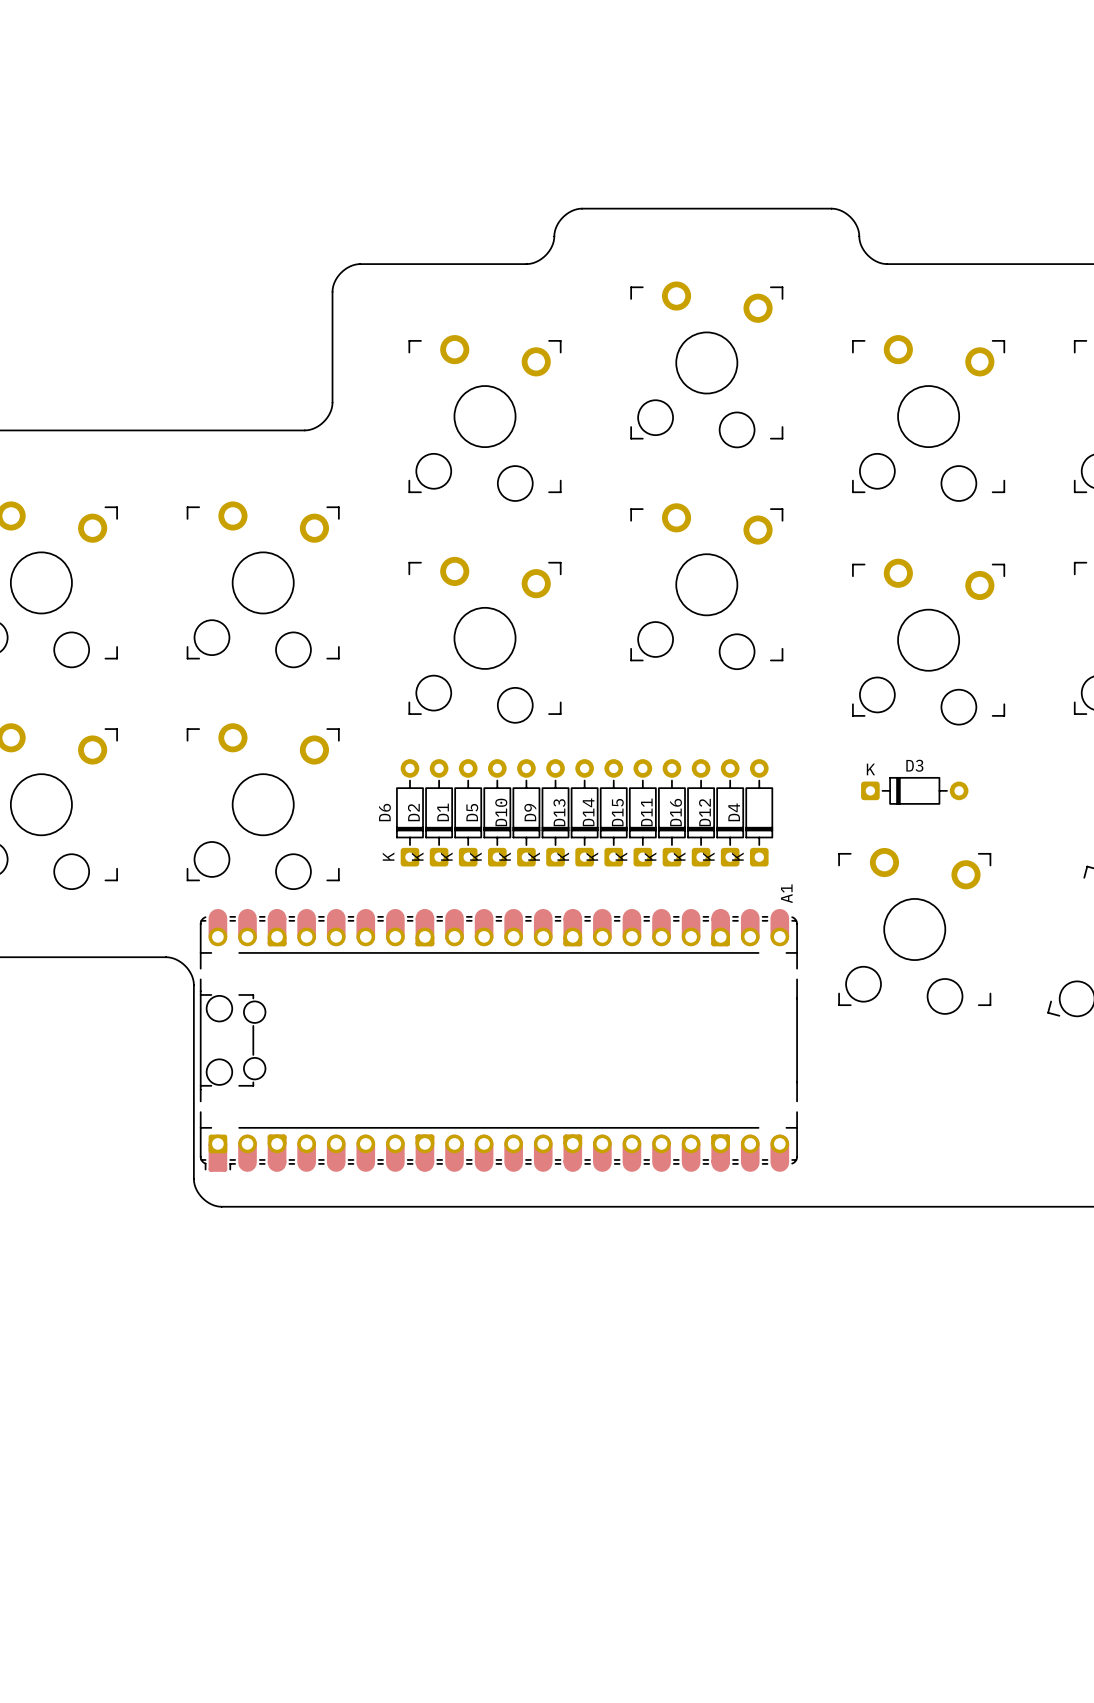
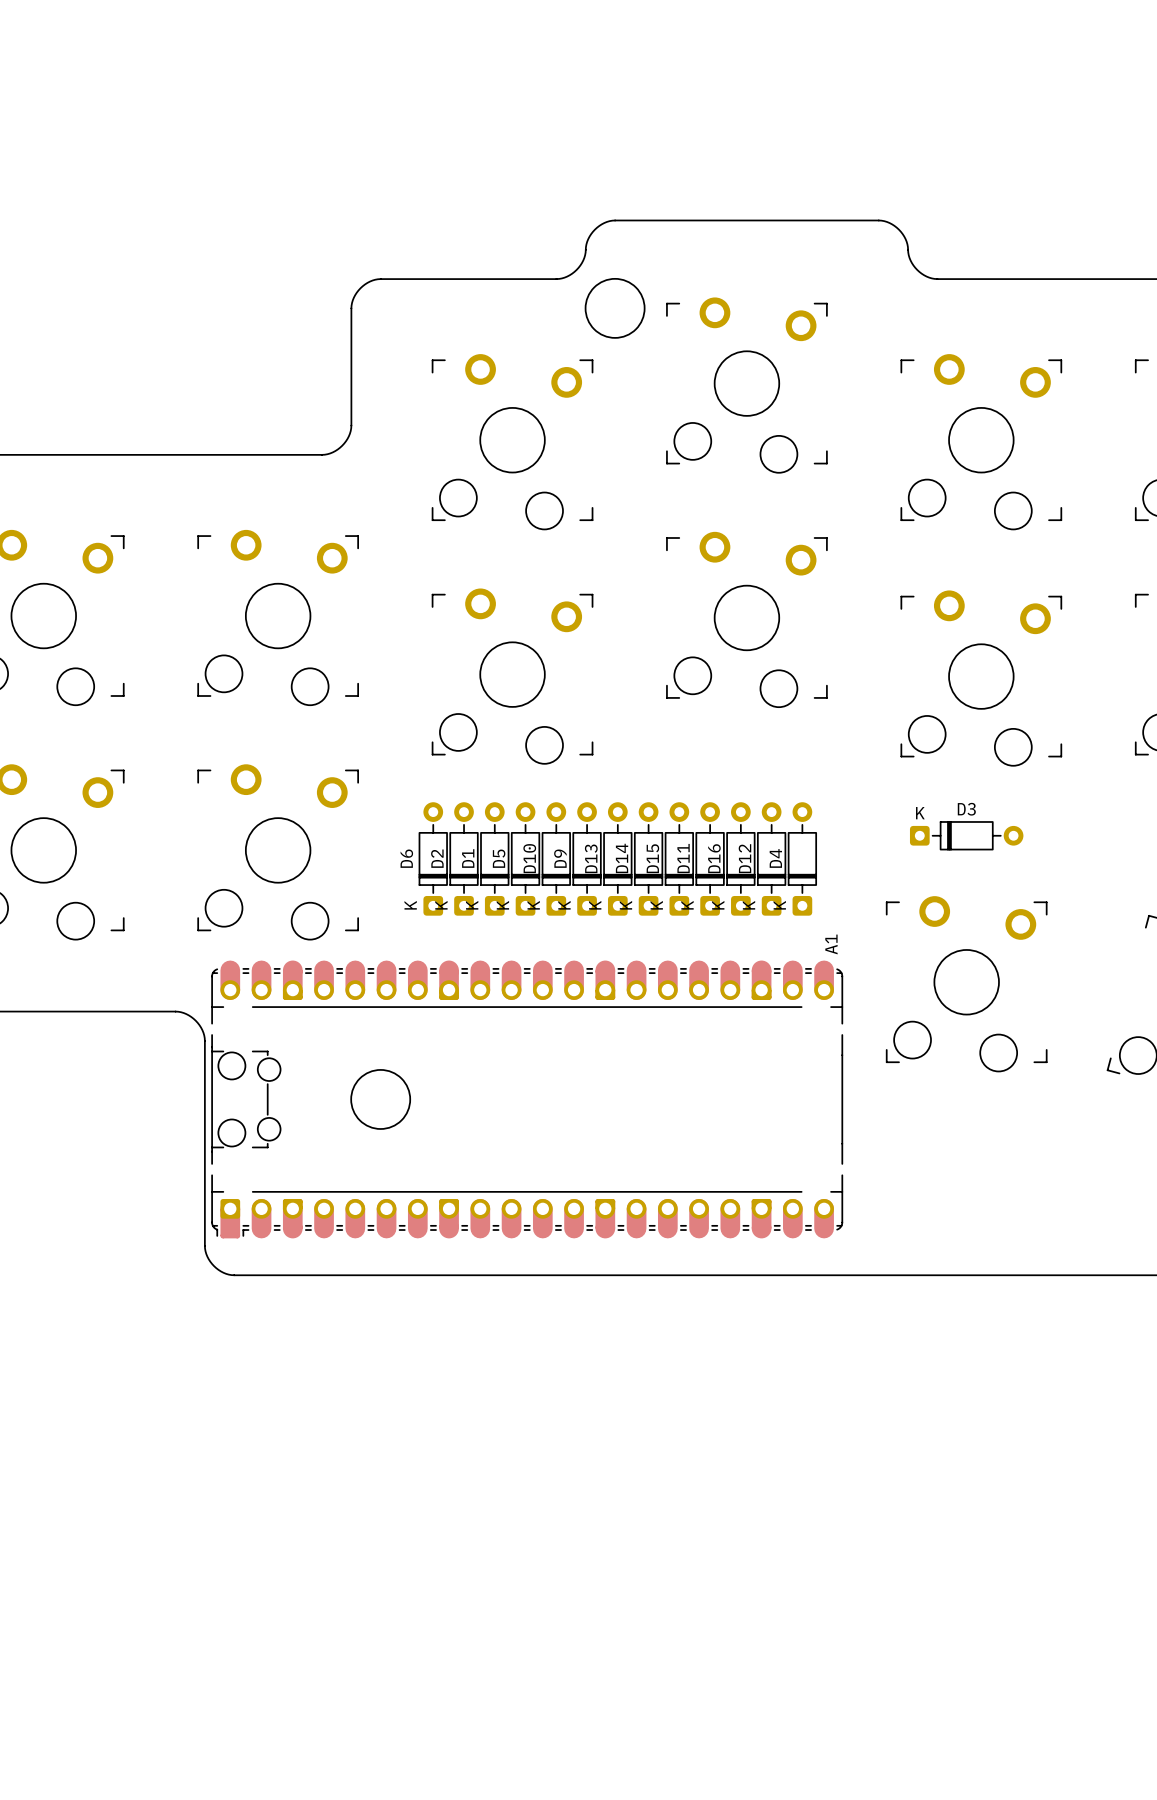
round board edge: none -> [585, 278, 645, 339]
round board edge: none -> [350, 1069, 411, 1130]

